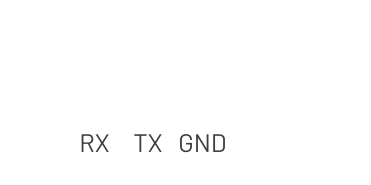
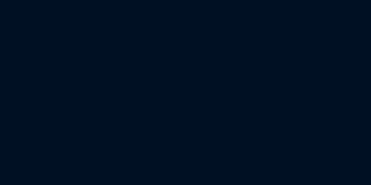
text: RX (95, 143) -> none
text: TX (147, 143) -> none
text: GND (202, 143) -> none

